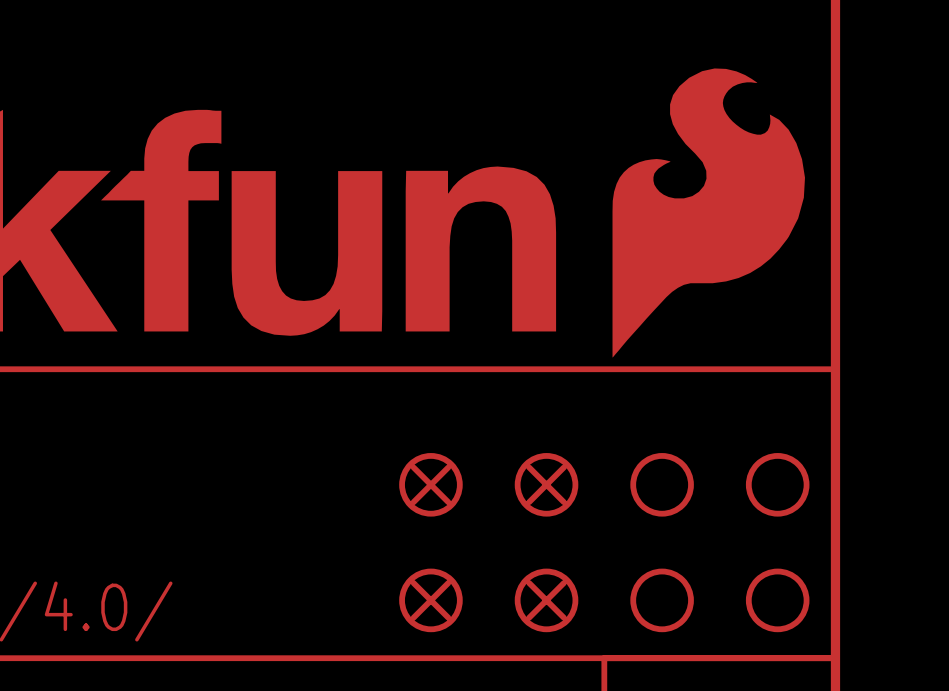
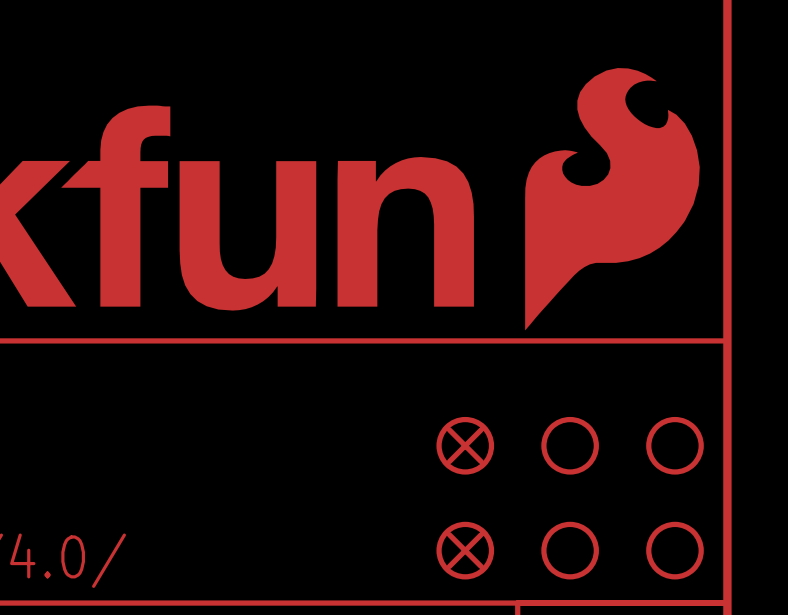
part: (430, 484) -> none
part: (430, 600) -> none

